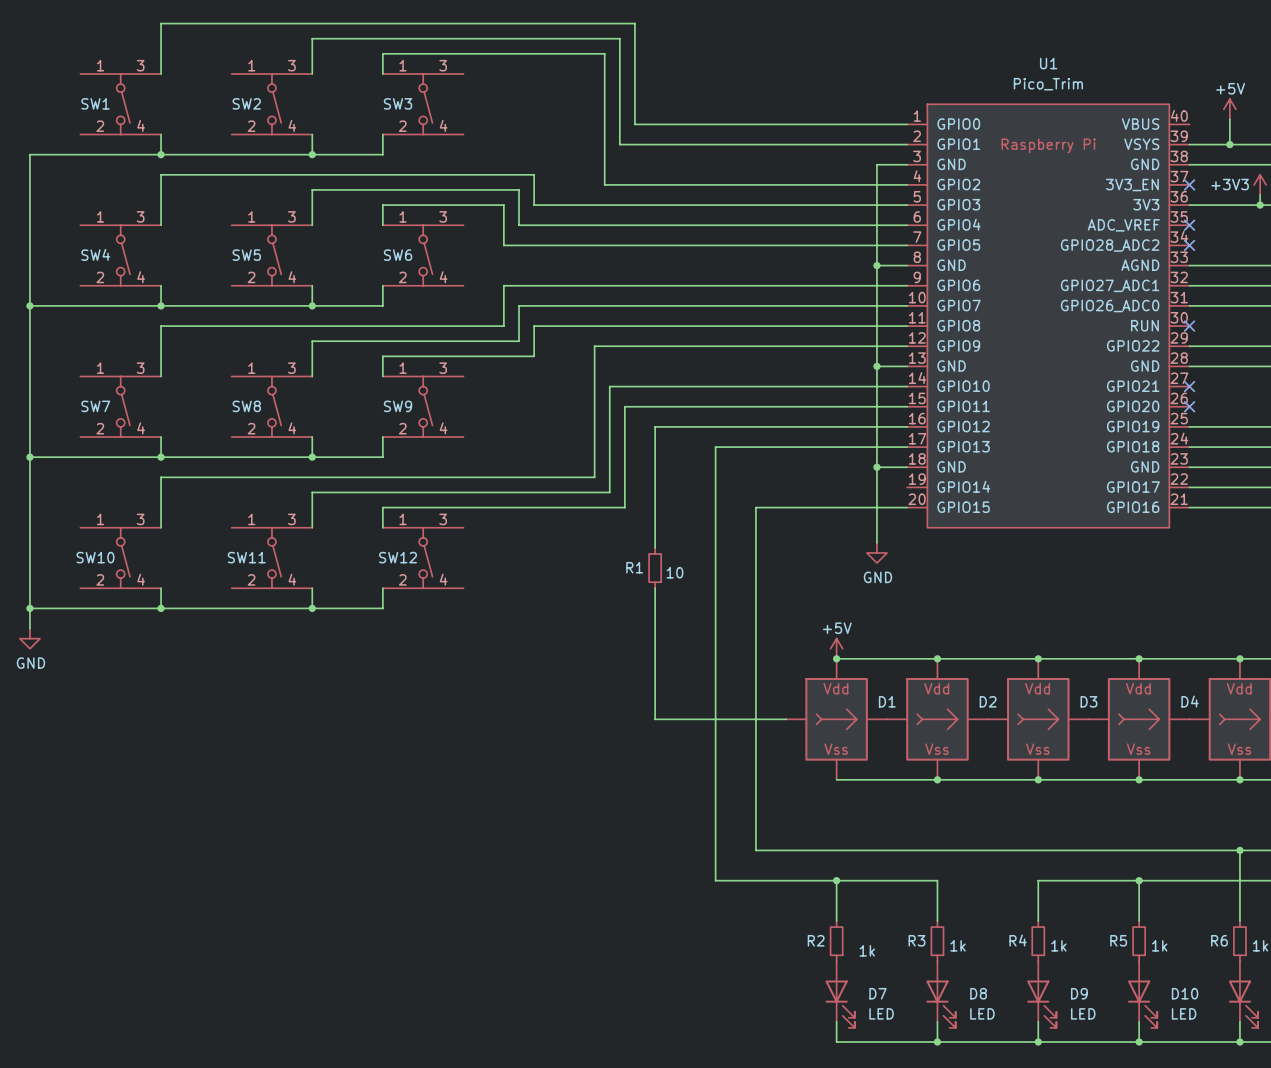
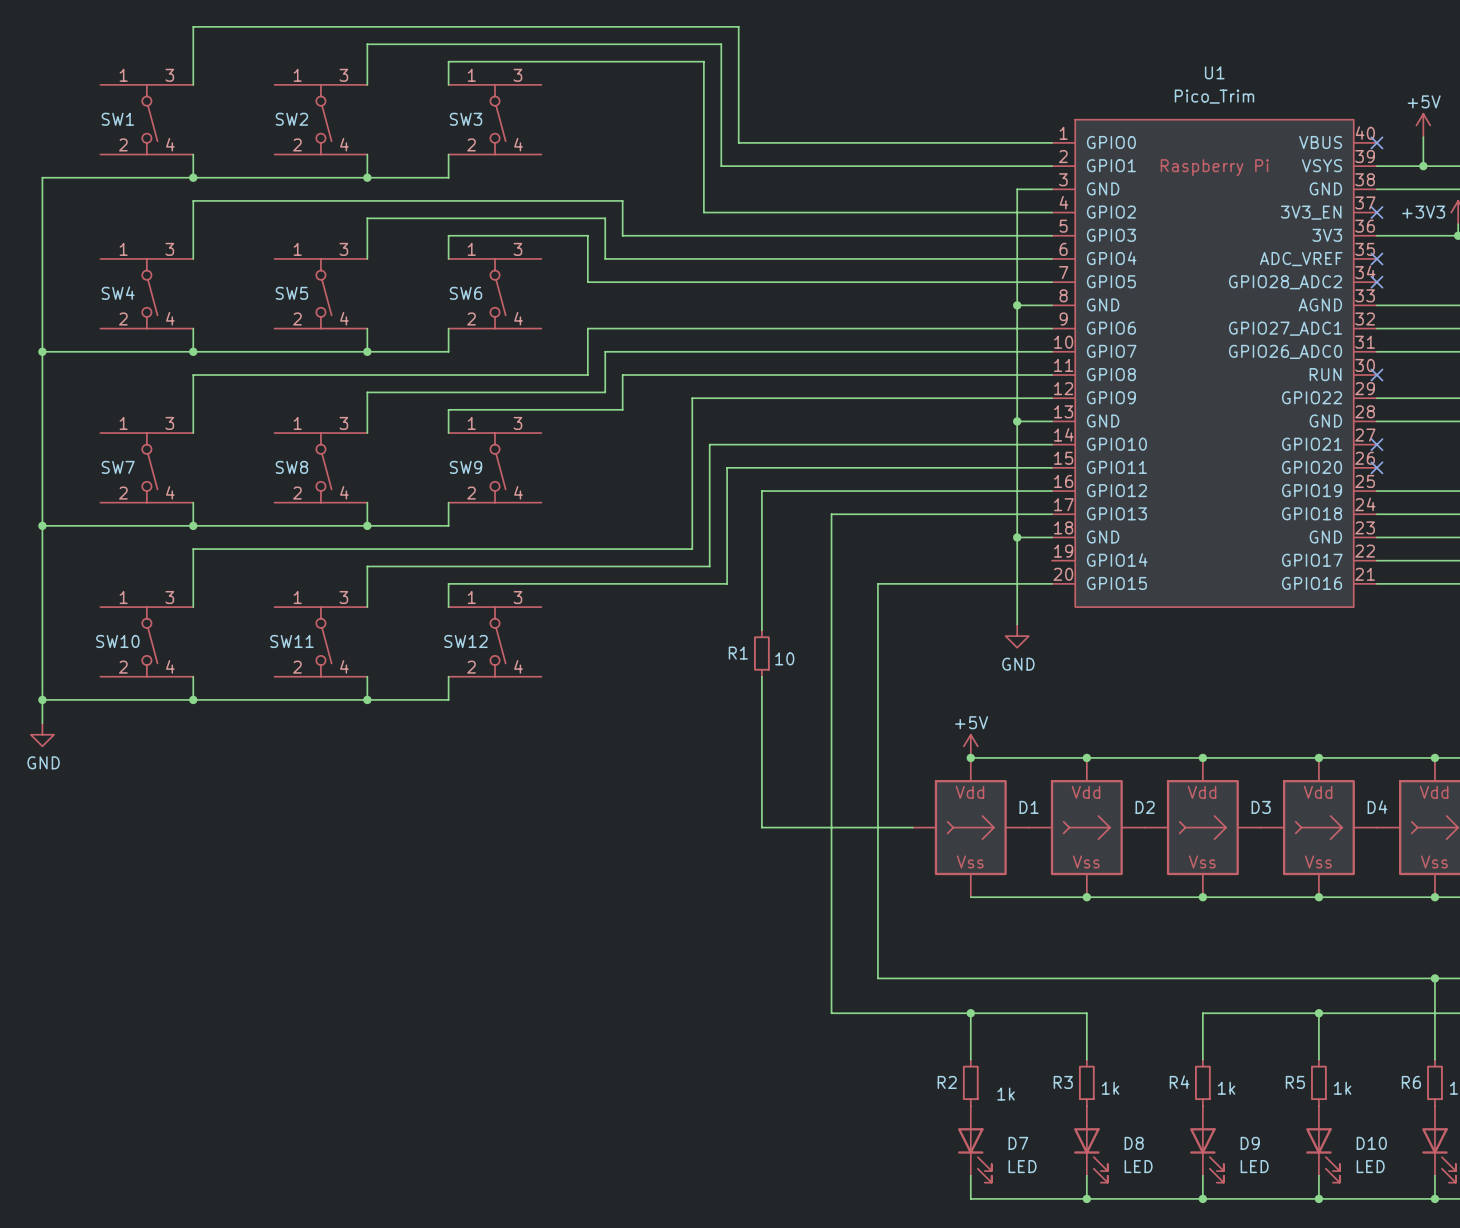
no-connect mark: none -> (1376, 142)

